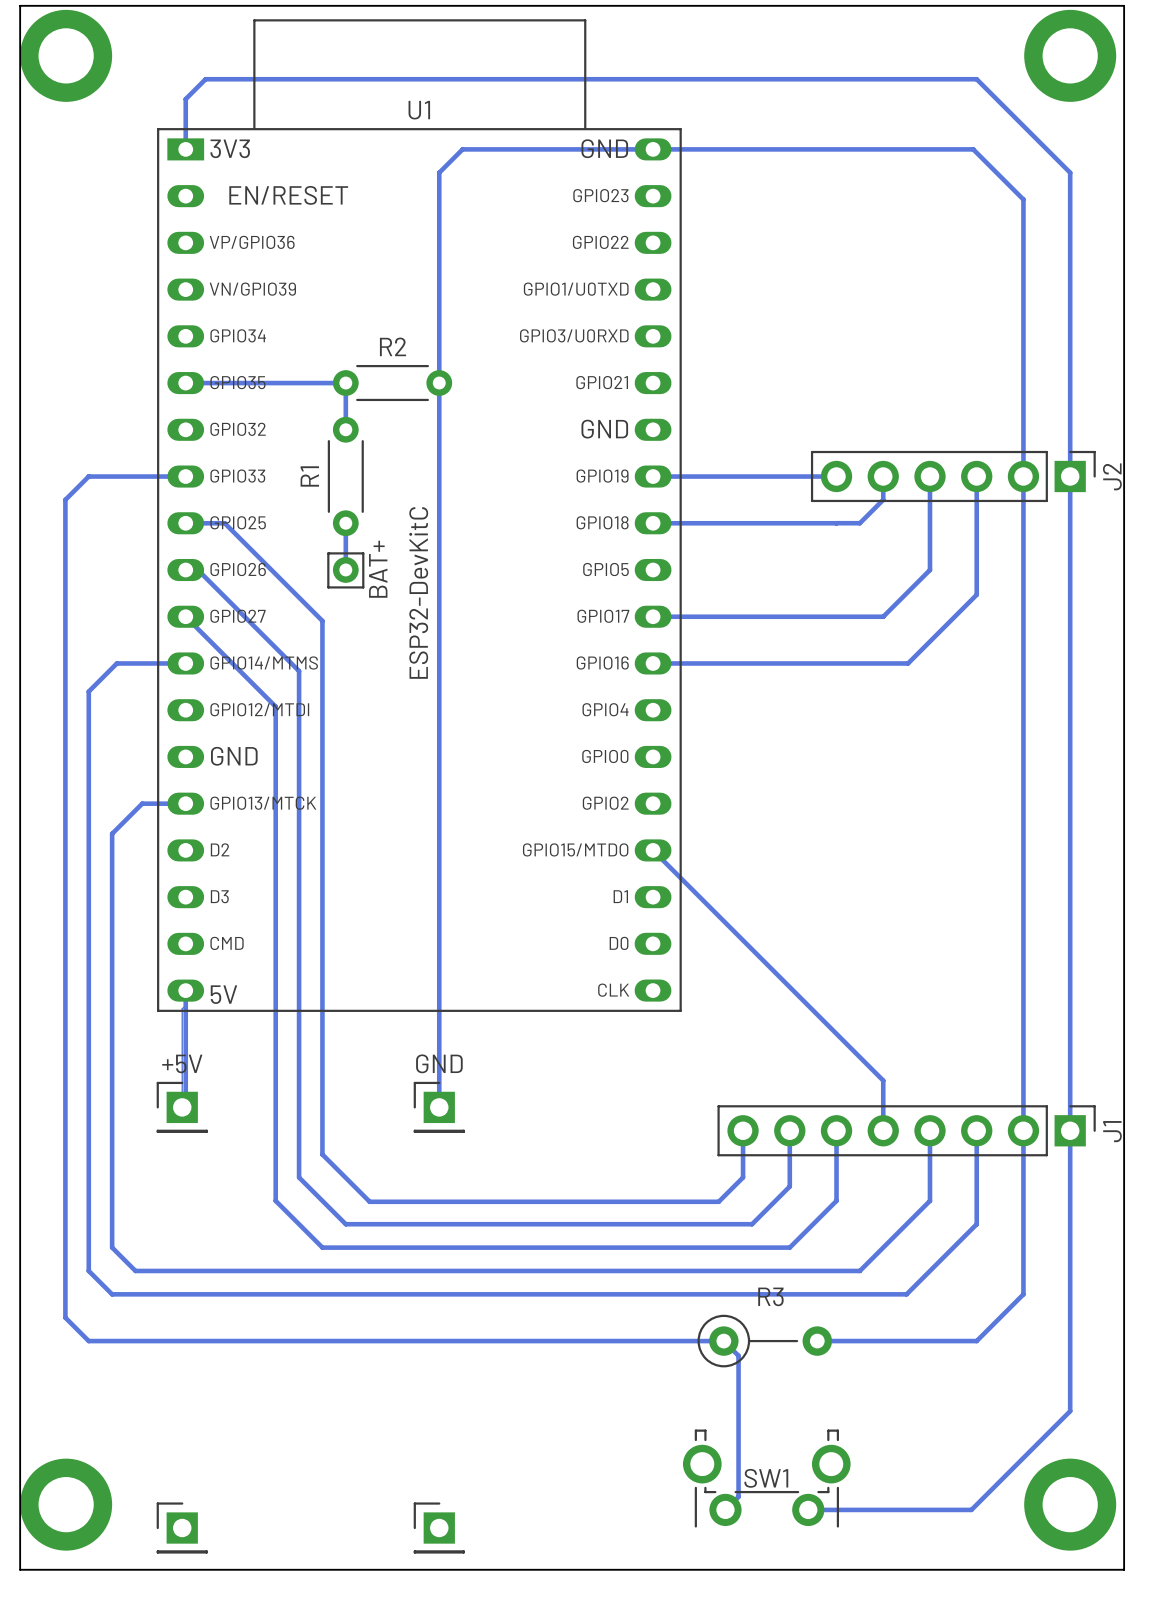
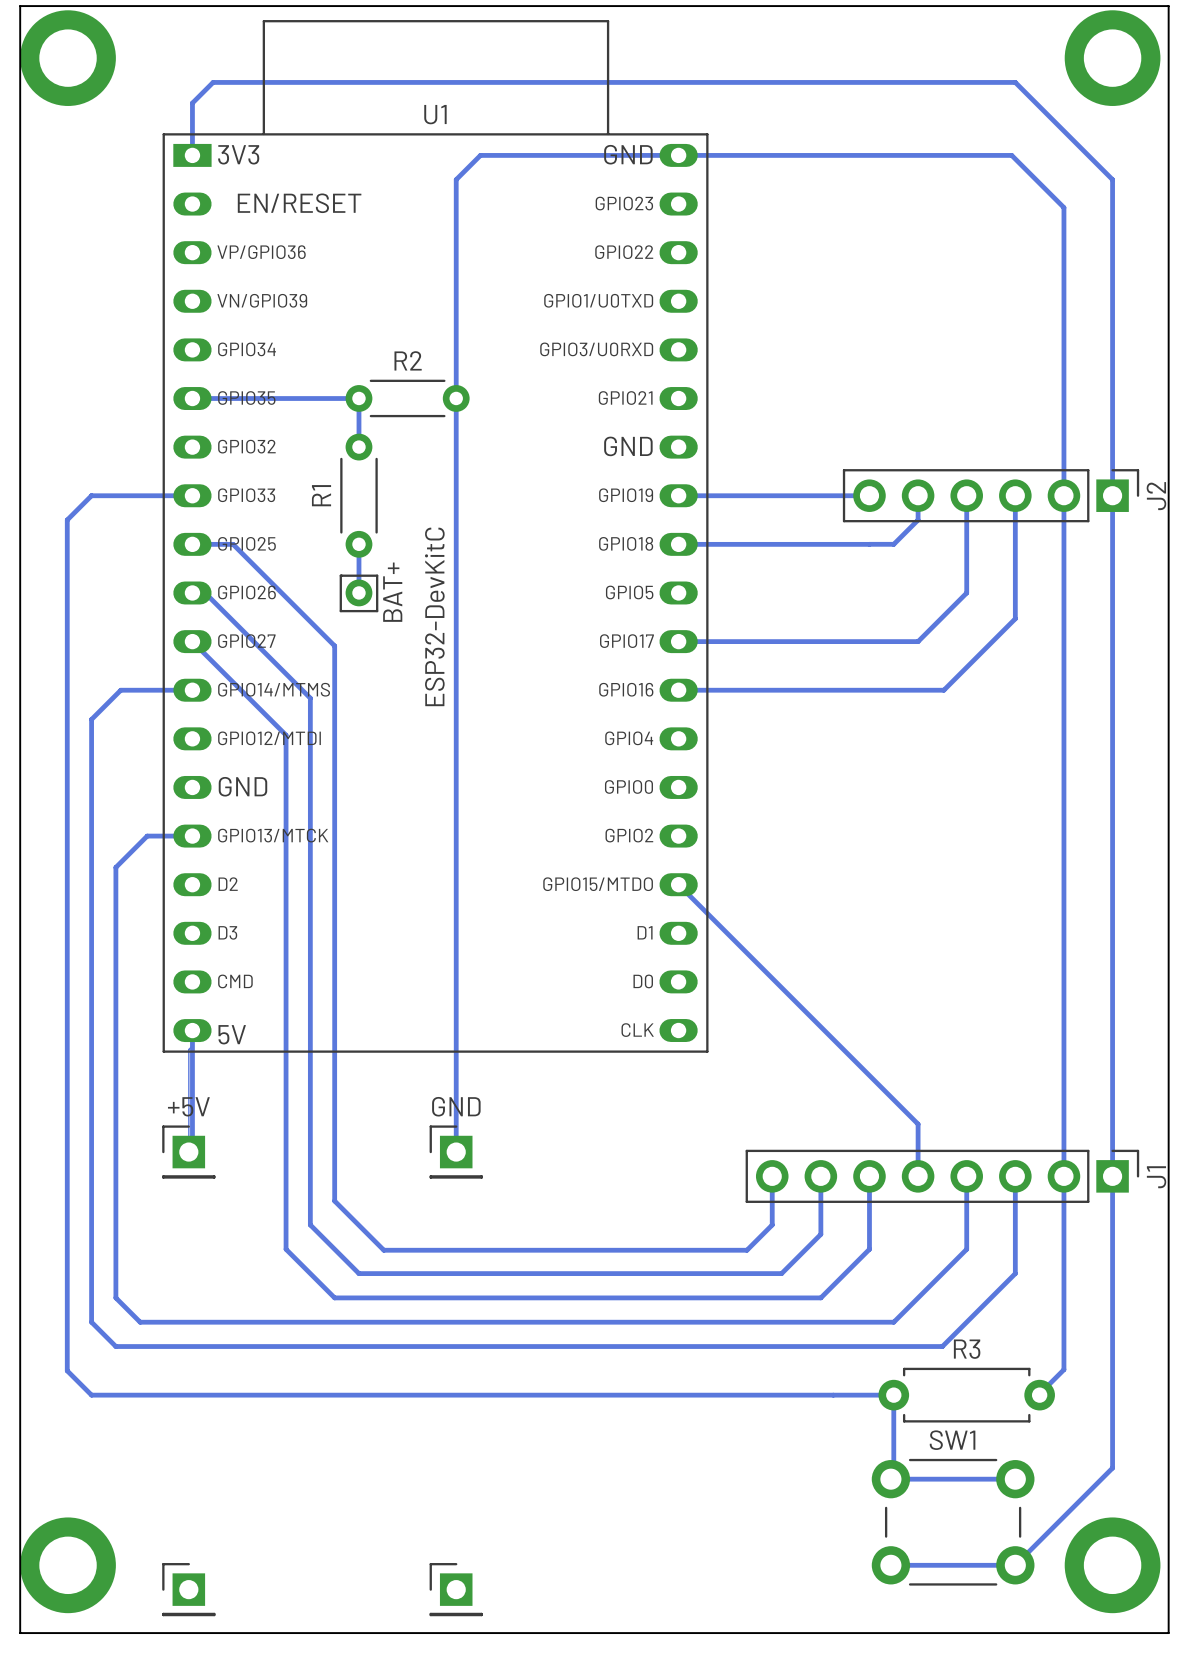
bottom track: (1023, 1294) (976, 1341) (859, 1341) -> (1015, 1479) (890, 1479) (893, 1476) (893, 1395)
bottom track: none -> (1063, 1346) (1063, 1369) (1045, 1388)
R3 footprint: [697, 1314, 833, 1368] -> [878, 1367, 1055, 1423]
bottom track: (723, 1341) (738, 1355) (738, 1496) (725, 1509) -> (752, 1395) (849, 1395)
SW1 footprint: [682, 1429, 851, 1528] -> [871, 1458, 1035, 1586]
SW1 name position: SW1 (766, 1478) -> SW1 (952, 1440)
bottom track: (976, 1504) (971, 1509) (808, 1509) -> (1015, 1565) (890, 1565)

